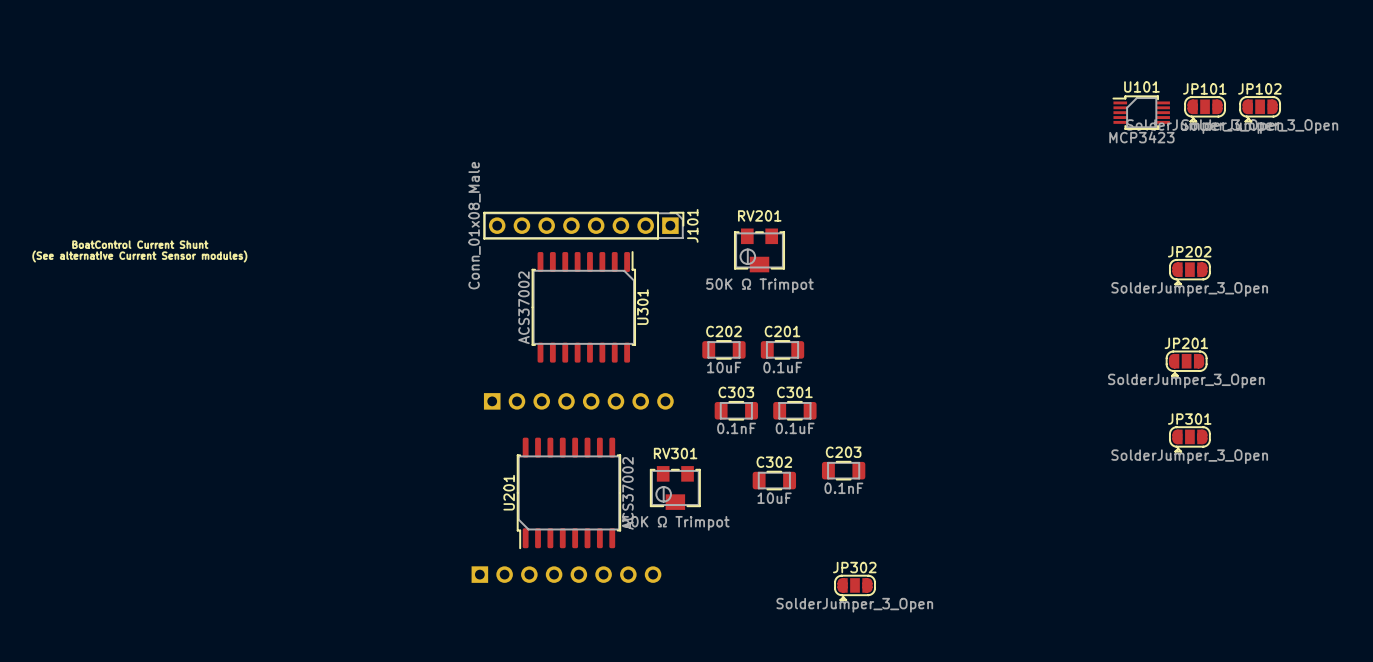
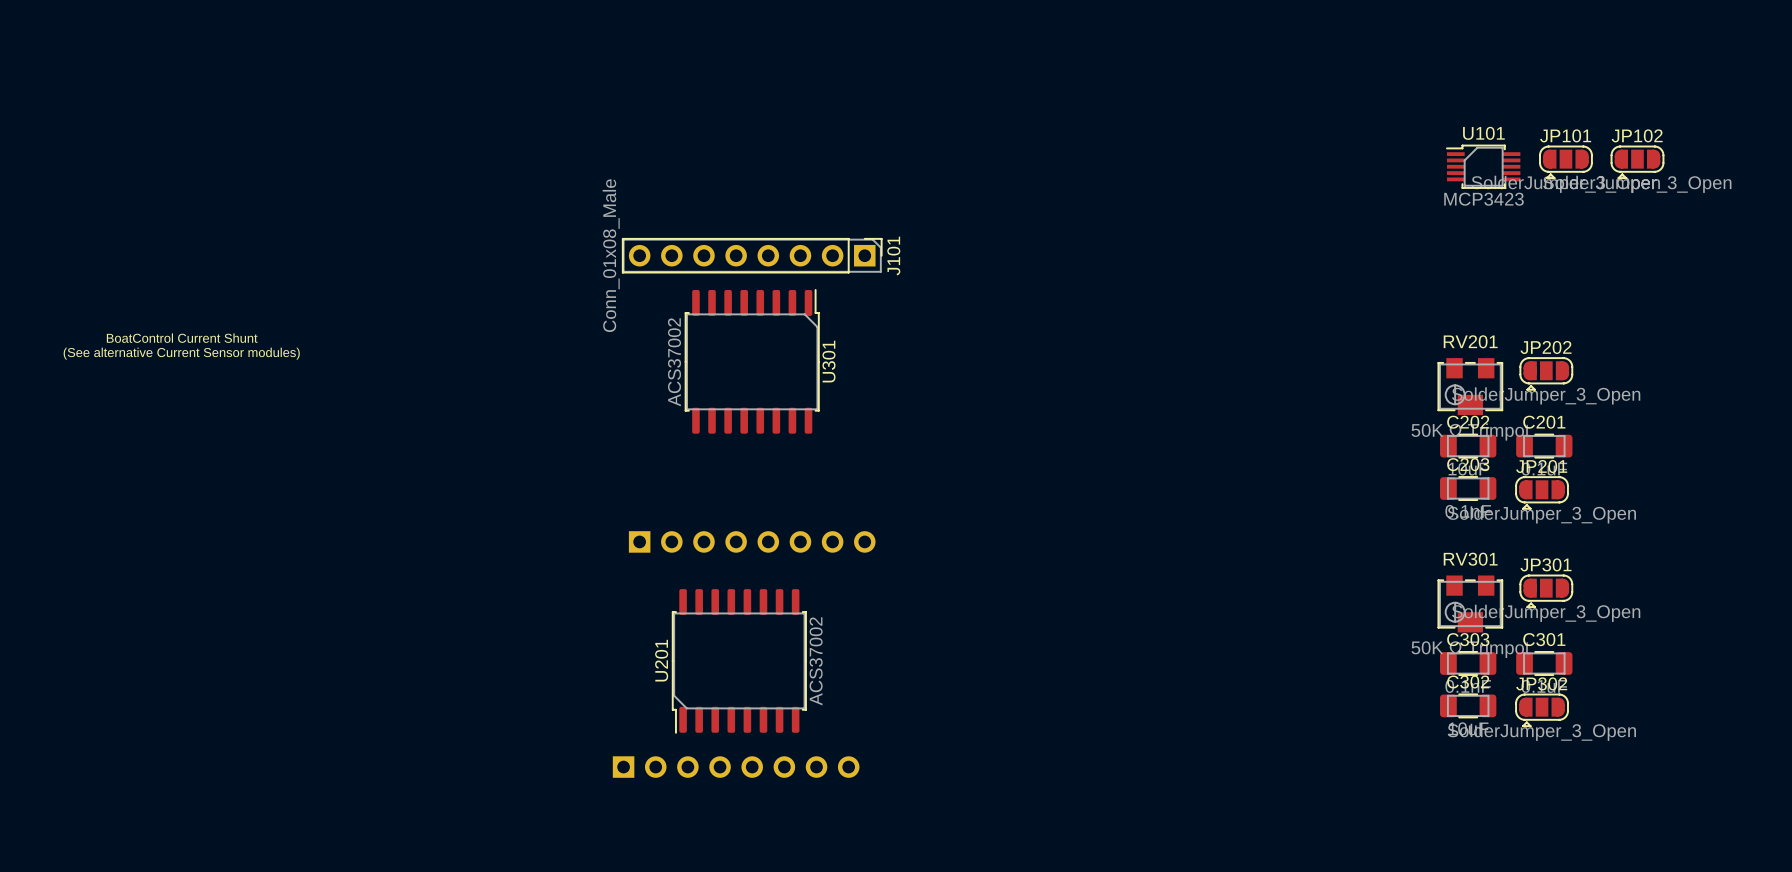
J101 position: (583, 225) -> (752, 255)
RV201 footprint: [734, 228, 785, 273] -> [1437, 358, 1504, 416]
U301 position: (583, 307) -> (752, 361)
C202 position: (723, 349) -> (1468, 446)
C201 position: (782, 349) -> (1544, 446)
C303 position: (736, 410) -> (1468, 663)
C301 position: (794, 410) -> (1544, 663)
RV301 footprint: [650, 466, 701, 510] -> [1437, 575, 1504, 633]
C203 position: (843, 470) -> (1468, 488)
C302 position: (774, 480) -> (1468, 705)
JP302 position: (855, 587) -> (1542, 710)

